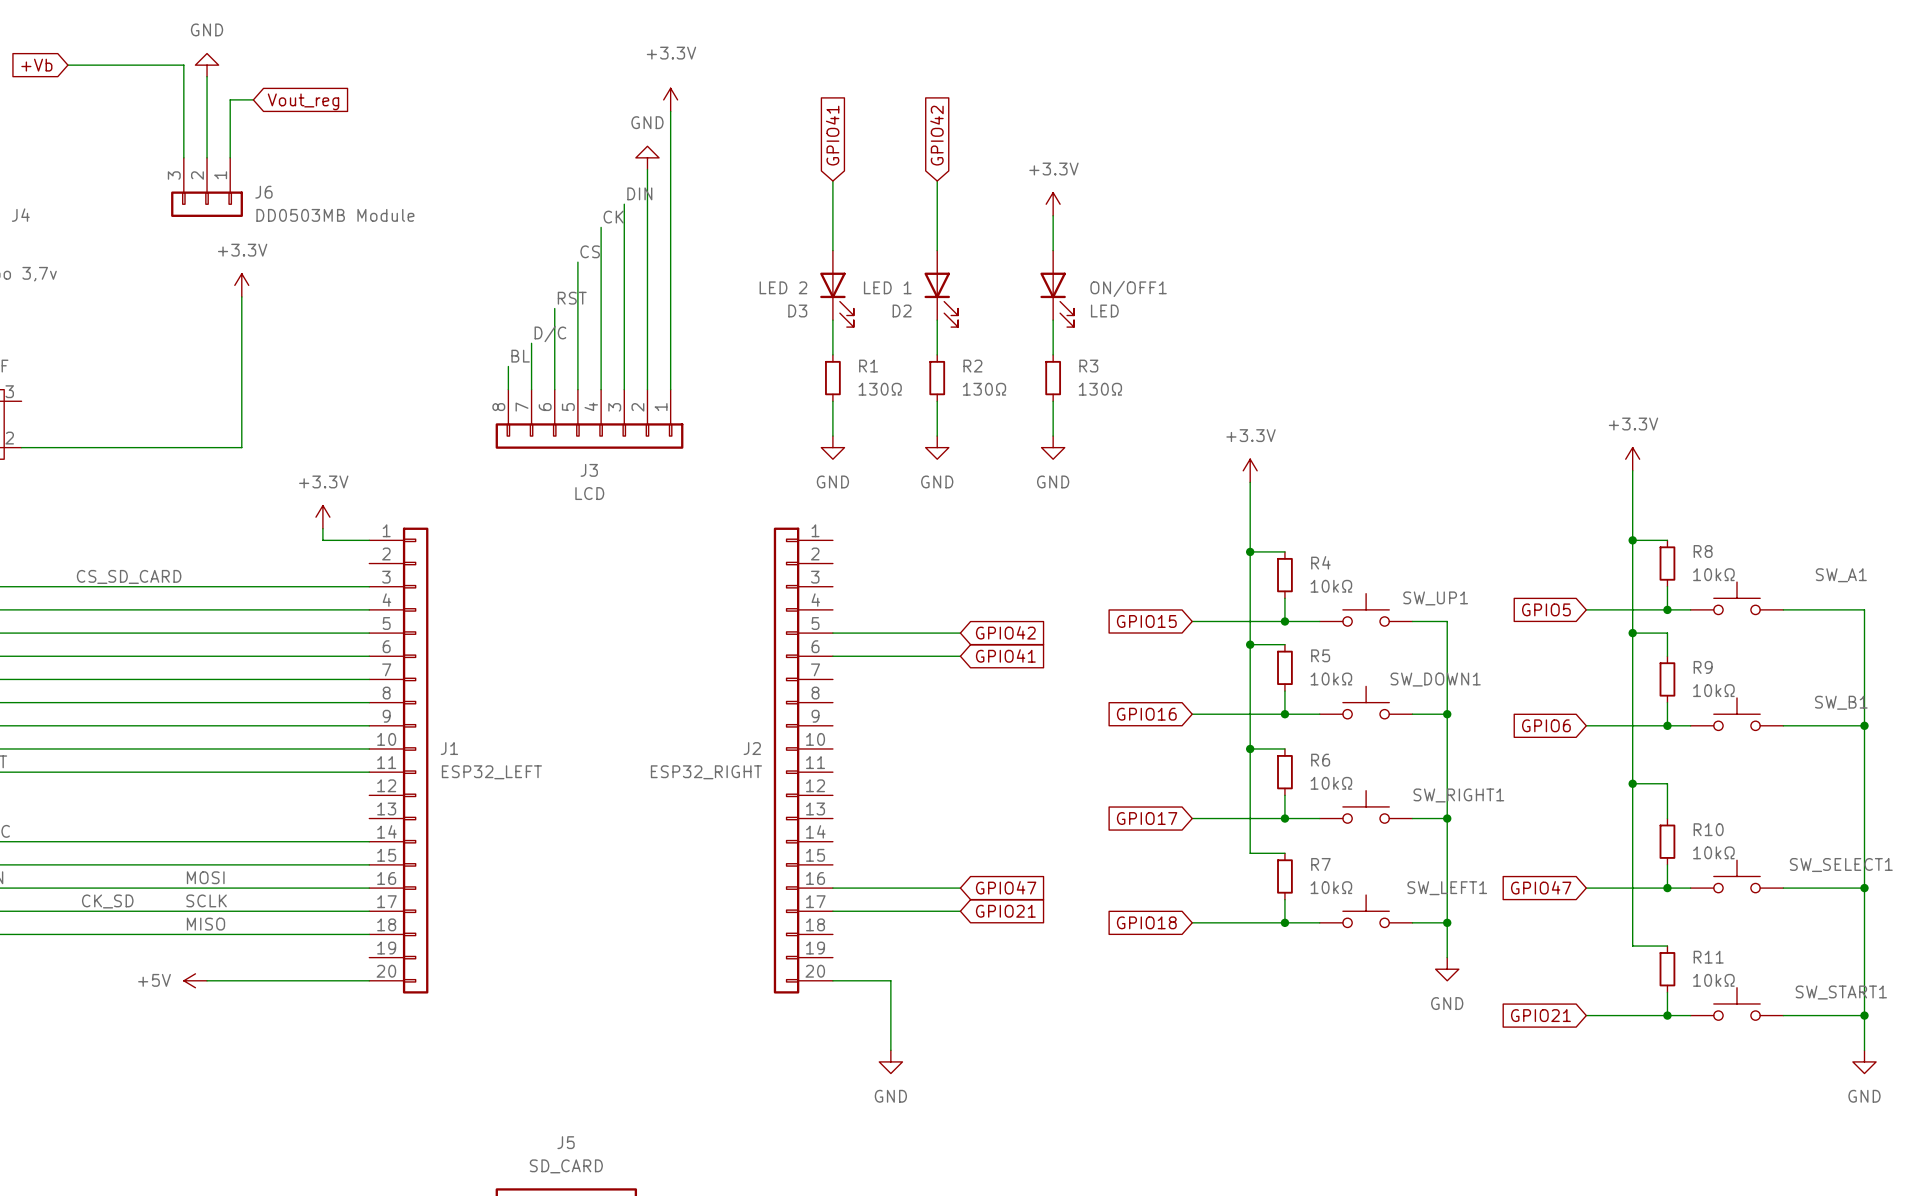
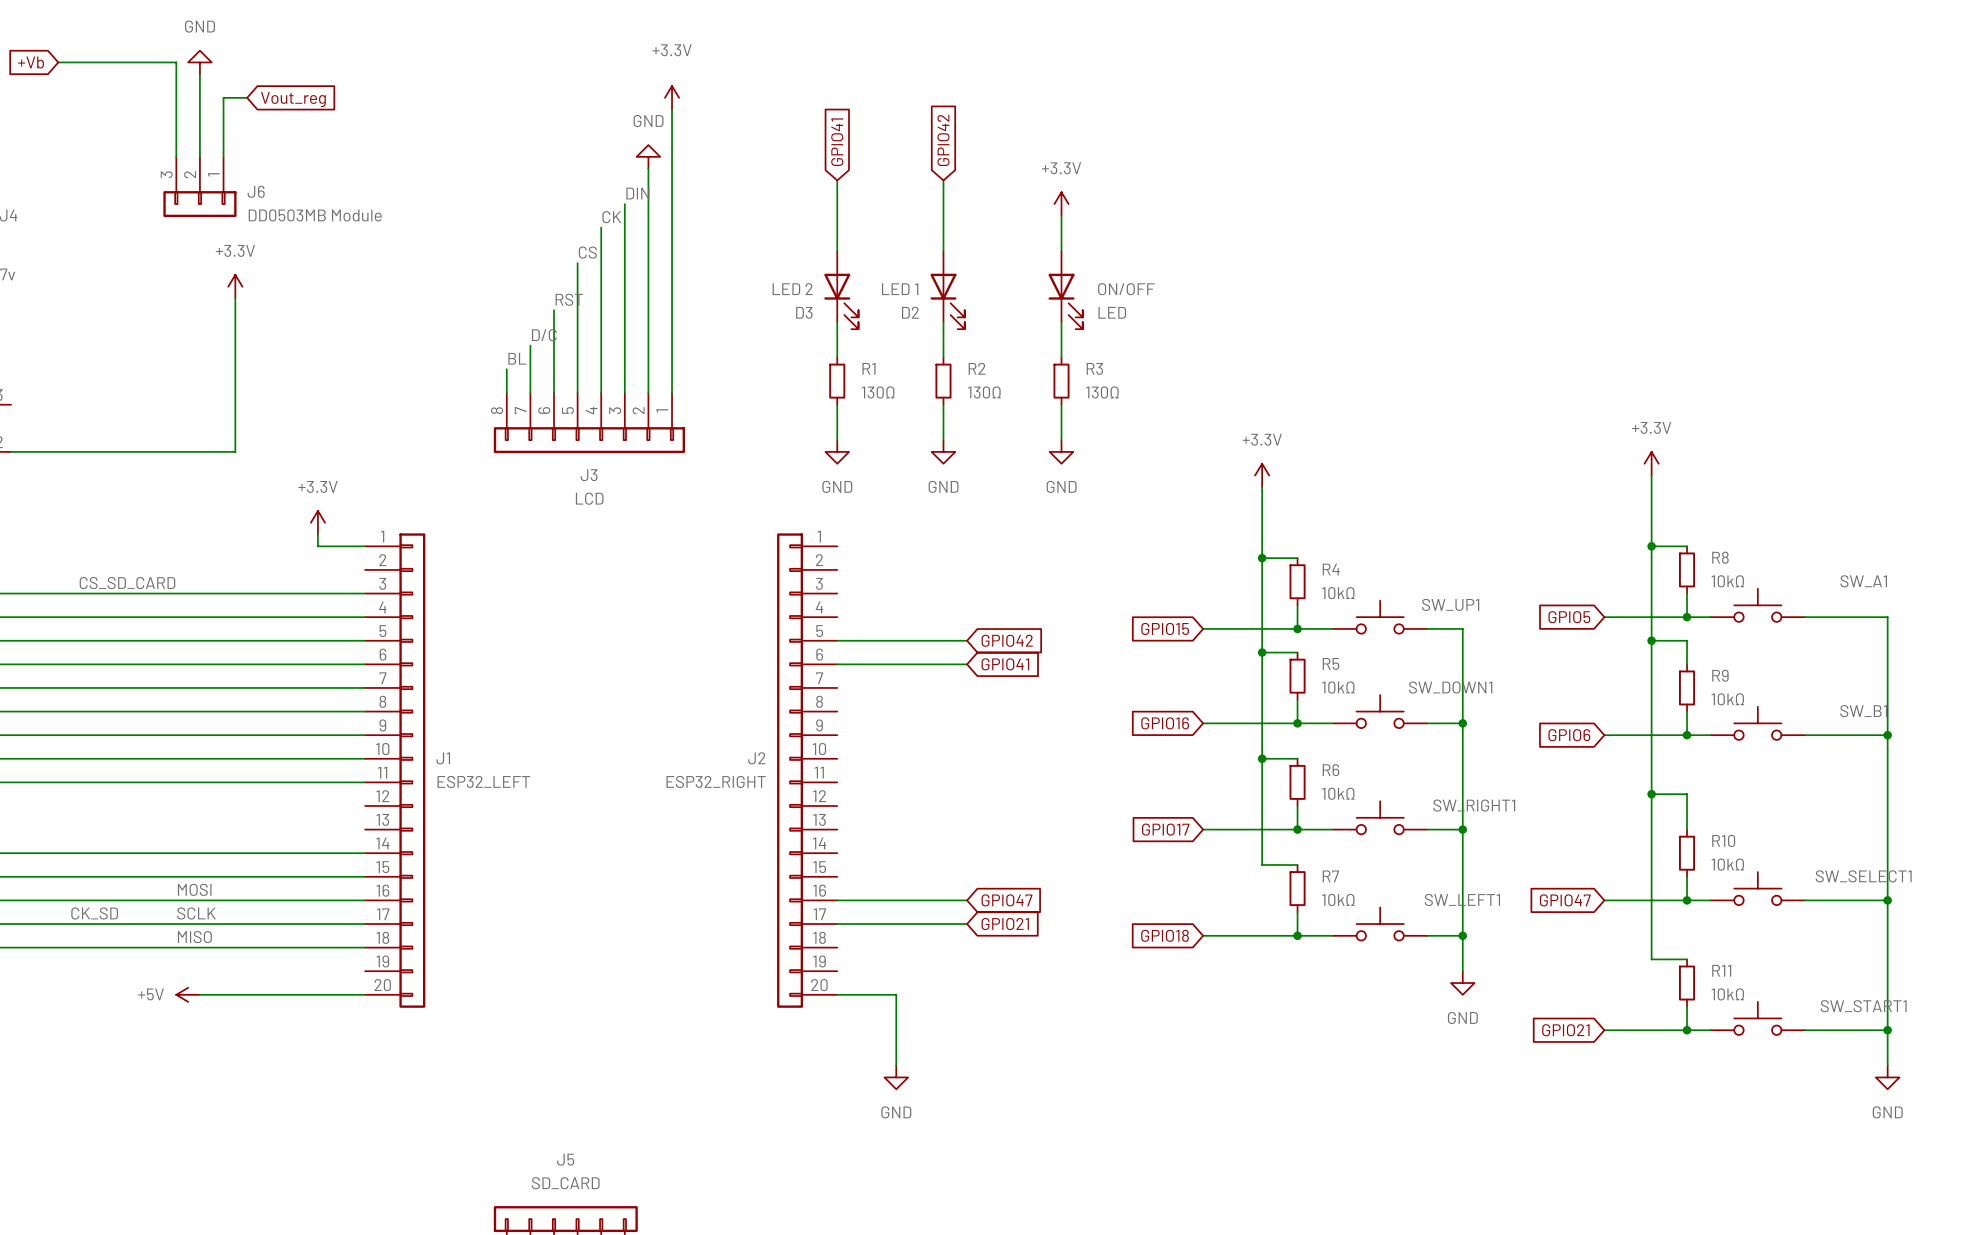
ON/OFF1 name: ON/OFF1 (1128, 288) -> ON/OFF (1126, 289)

